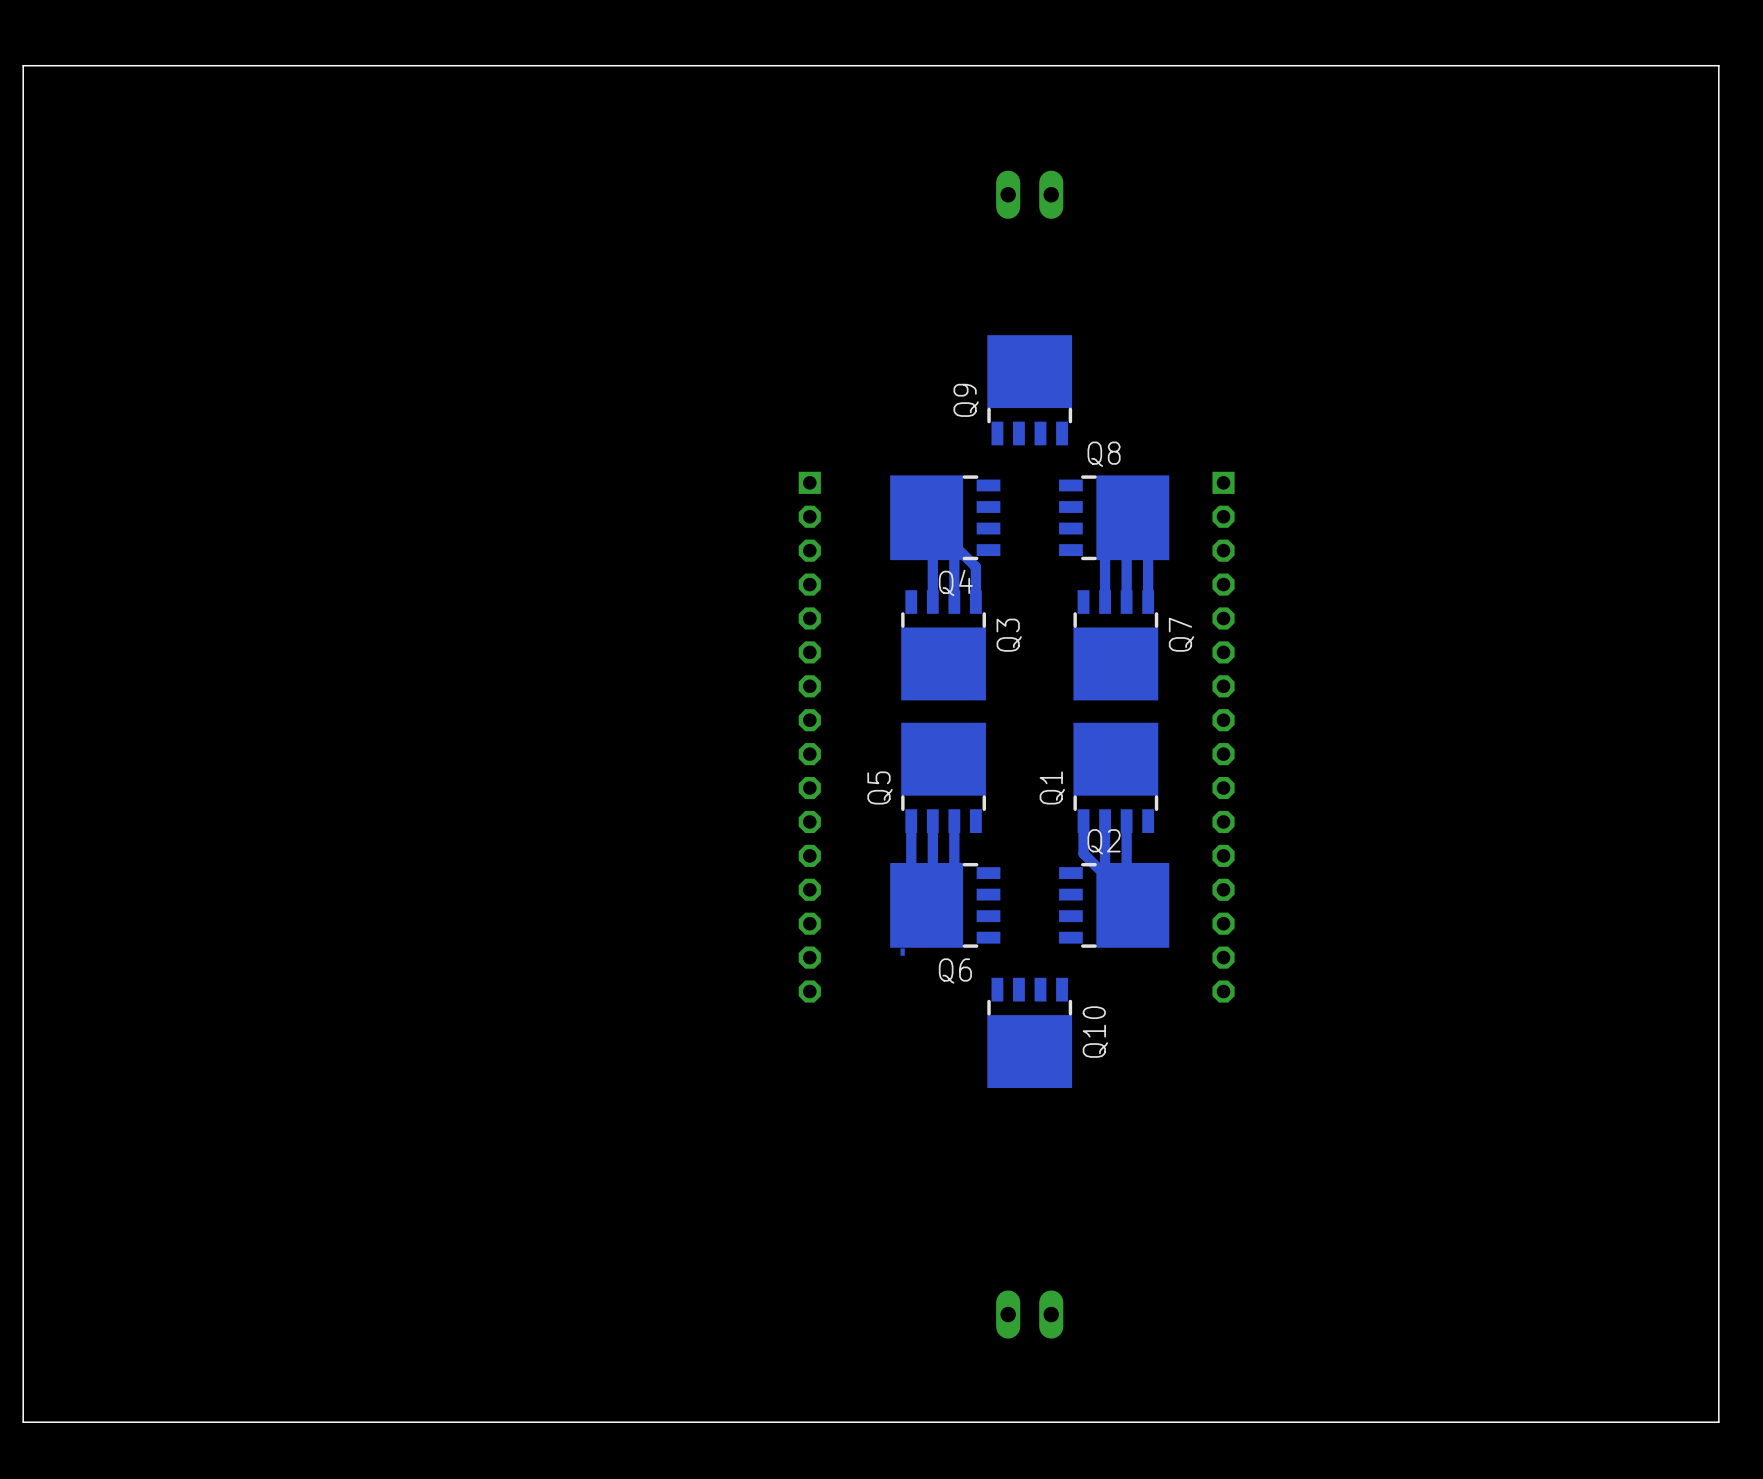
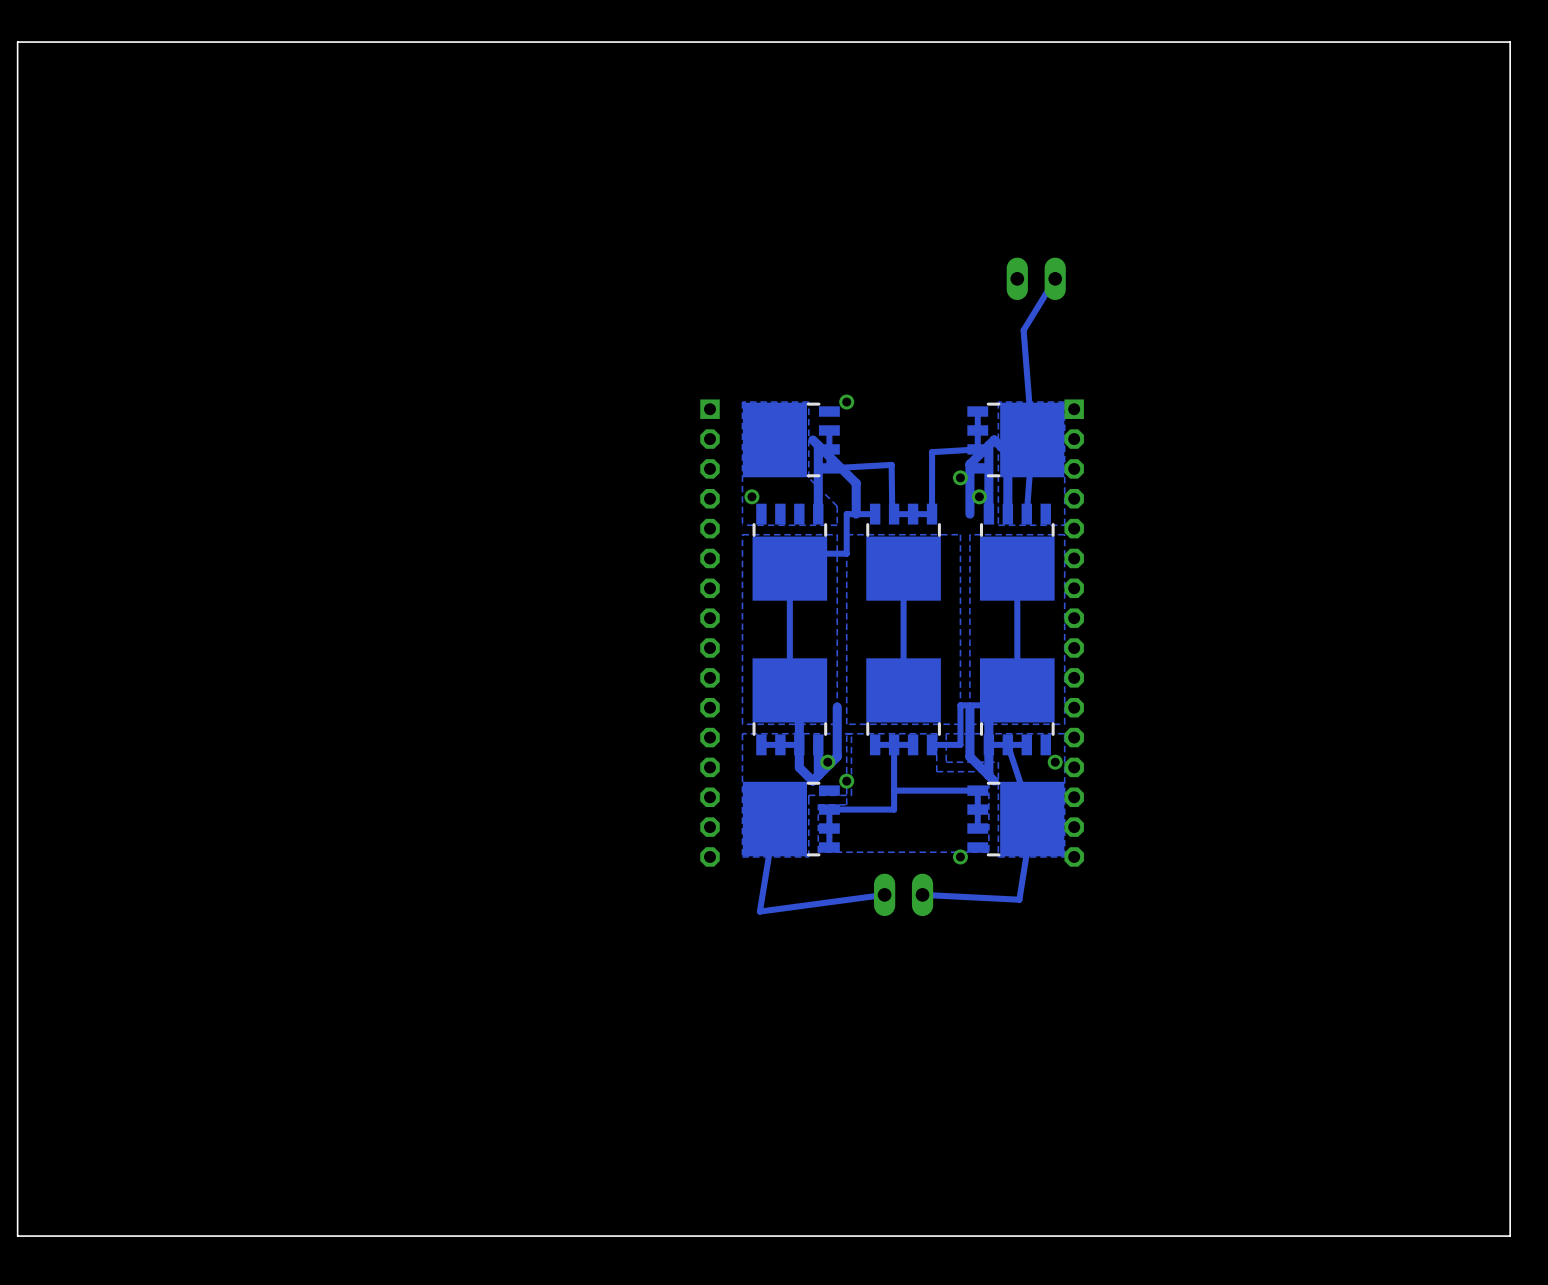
part position: (1029, 194) -> (1036, 278)
track: none -> (1055, 278) (1023, 330) (1032, 439) (1026, 514)
Q9: (1029, 390) -> none
zone outline: none -> (808, 402) (808, 477) (837, 506) (837, 525) (742, 525) (742, 402) (808, 402)
via: none -> (846, 402)
zone outline: none -> (1064, 402) (1064, 525) (998, 525) (998, 402) (1064, 402)
track: none -> (977, 411) (977, 449) (932, 452) (932, 514) (892, 514)
track: none -> (829, 430) (829, 468) (891, 464) (892, 514)
part: none -> (791, 439)
Q4: (945, 517) -> none
Q8: (1114, 517) -> none
part: none -> (1015, 439)
track: (954, 545) (954, 602) -> none
via: none -> (960, 477)
via: none -> (751, 496)
via: none -> (979, 496)
track: none -> (875, 514) (846, 514) (846, 553) (789, 553) (789, 690)
zone outline: none -> (837, 534) (742, 534) (742, 724) (837, 724) (837, 534)
zone outline: none -> (960, 534) (846, 534) (846, 724) (960, 724) (960, 534)
zone outline: none -> (1064, 534) (1064, 724) (969, 724) (969, 534) (1064, 534)
part: none -> (789, 552)
Q3: (943, 645) -> none
part: none -> (903, 552)
Q7: (1115, 645) -> none
part: none -> (1017, 552)
track: none -> (903, 568) (903, 705)
track: none -> (1017, 568) (1017, 705) (960, 705) (960, 744) (932, 744)
Q5: (943, 777) -> none
Q1: (1115, 777) -> none
part: none -> (789, 706)
part: none -> (903, 706)
part: none -> (1017, 706)
track: (932, 821) (932, 864) -> none
track: (1083, 821) (1083, 853) (1105, 875) -> none
zone outline: none -> (851, 733) (851, 795) (808, 795) (808, 856) (742, 856) (742, 733) (936, 733) (936, 771) (988, 771) (988, 852) (818, 852) (818, 804) (846, 804) (846, 733)
zone outline: none -> (1064, 733) (1064, 856) (998, 856) (998, 762) (946, 762) (946, 733) (1064, 733)
track: none -> (799, 744) (761, 744)
track: none -> (894, 744) (894, 809) (829, 809) (829, 847)
track: none -> (913, 744) (875, 744)
track: none -> (1007, 744) (1032, 819) (1019, 899) (922, 894)
track: none -> (1026, 744) (988, 744)
via: none -> (827, 762)
via: none -> (1055, 762)
Q6: (945, 905) -> none
via: none -> (846, 781)
Q2: (1114, 905) -> none
track: none -> (894, 790) (977, 790) (977, 828)
track: none -> (774, 819) (759, 911) (884, 894)
drawing: [900, 948, 905, 956] -> none
part: none -> (791, 819)
part: none -> (1015, 819)
via: none -> (960, 856)
Q10: (1029, 1032) -> none
part position: (1029, 1314) -> (903, 894)

